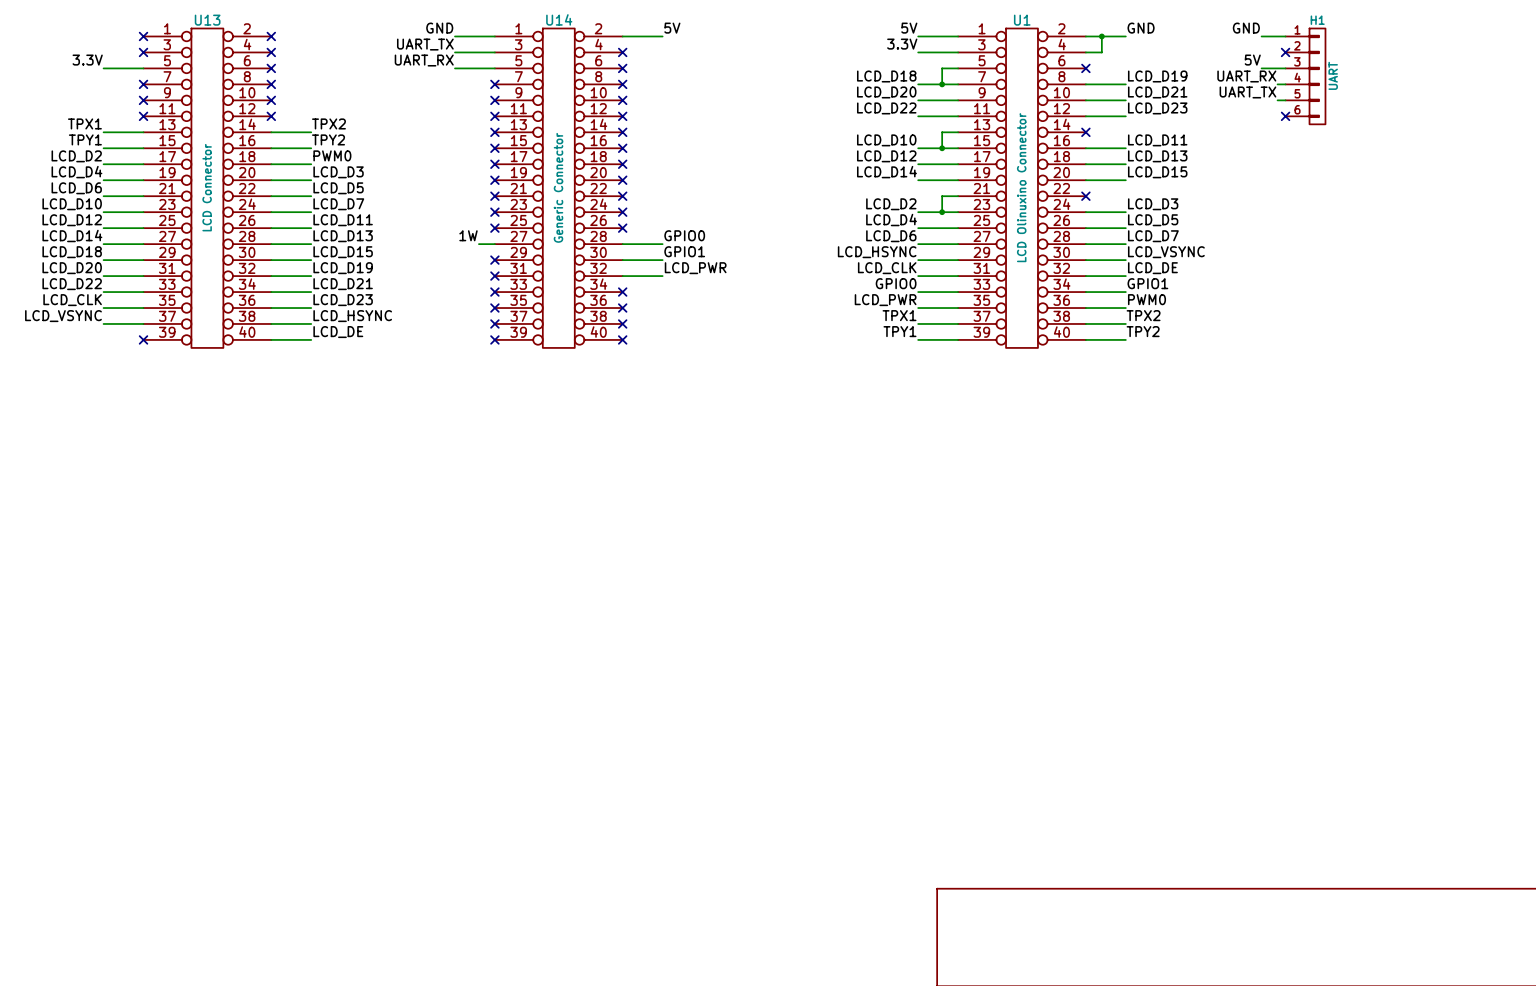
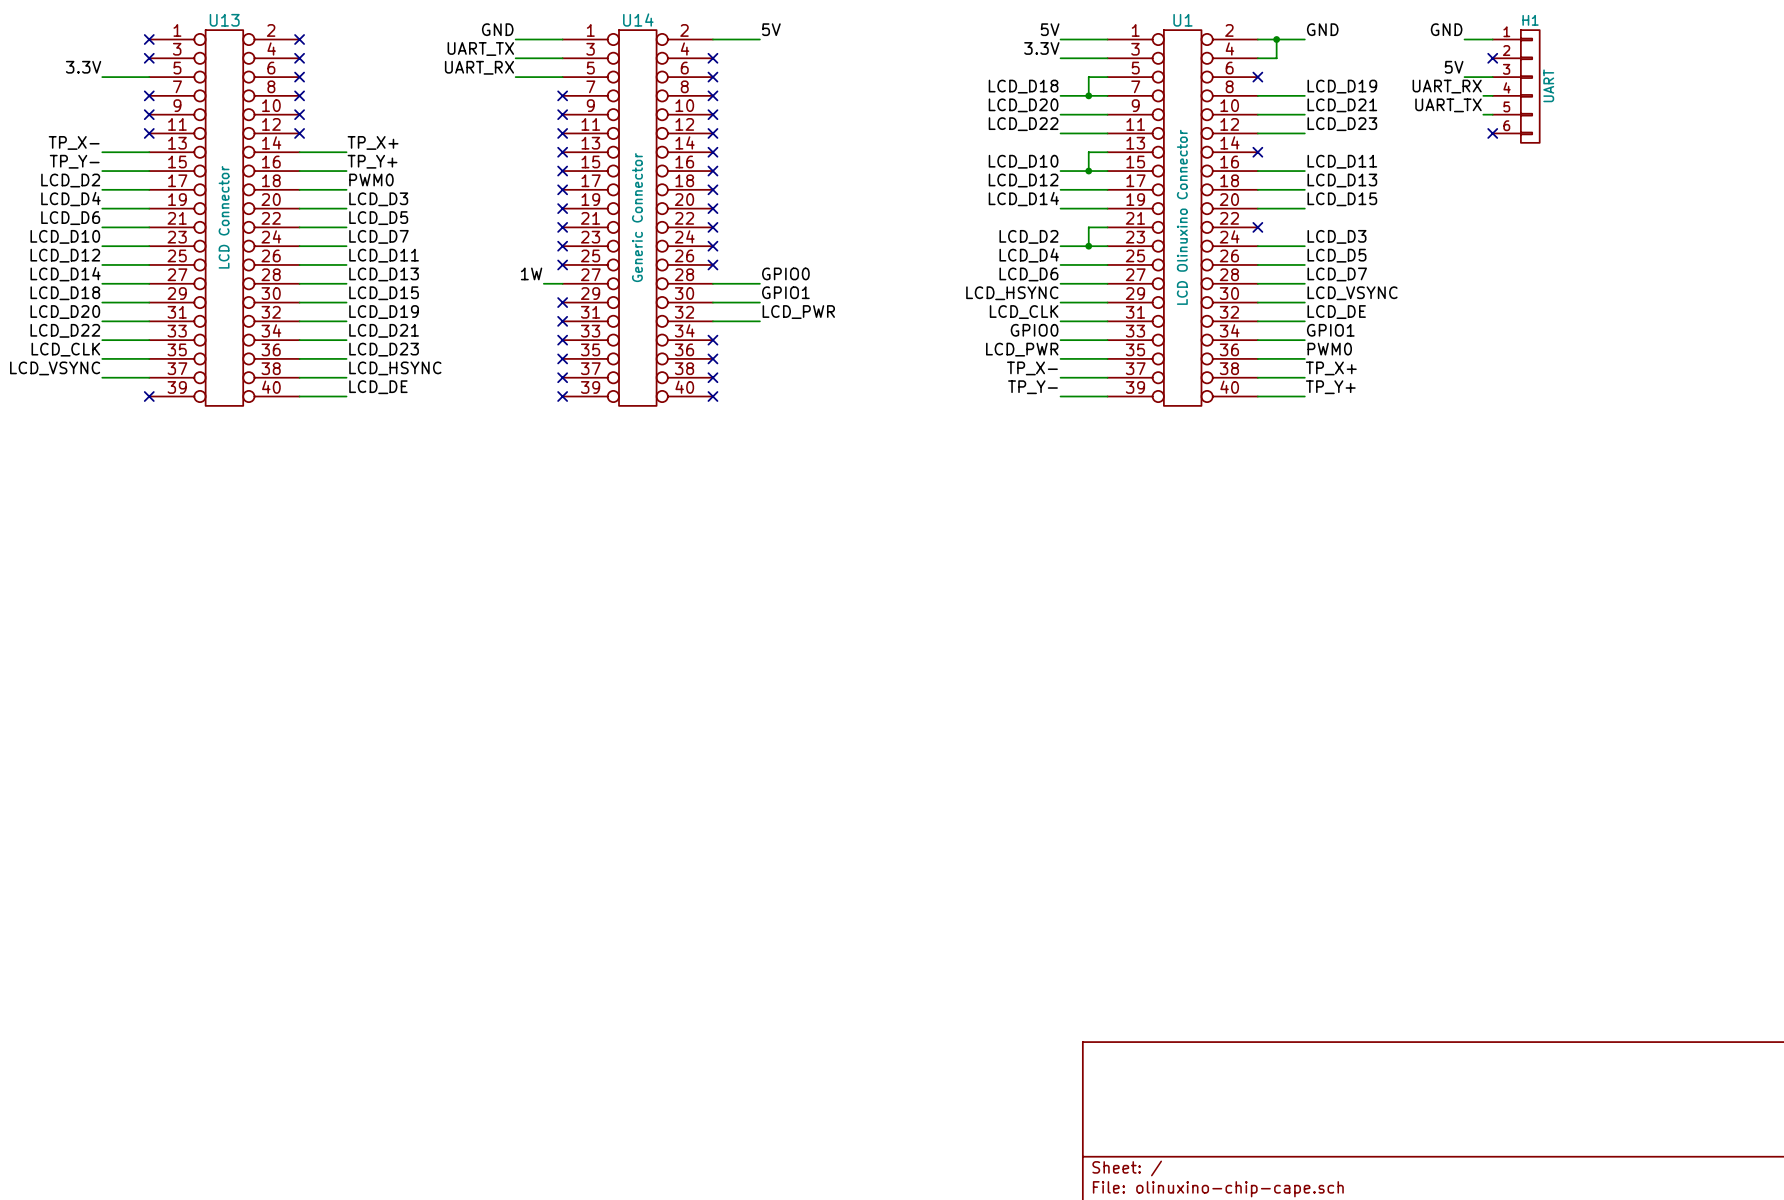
label: TPX1 (84, 123) -> TP_X- (74, 142)
label: TPX2 (328, 123) -> TP_X+ (373, 142)
label: TPY1 (85, 139) -> TP_Y- (74, 161)
label: TPY2 (328, 139) -> TP_Y+ (372, 161)
label: TPX1 (899, 315) -> TP_X- (1032, 368)
label: TPX2 (1143, 315) -> TP_X+ (1331, 368)
label: TPY1 (899, 331) -> TP_Y- (1032, 387)
label: TPY2 (1143, 331) -> TP_Y+ (1330, 387)

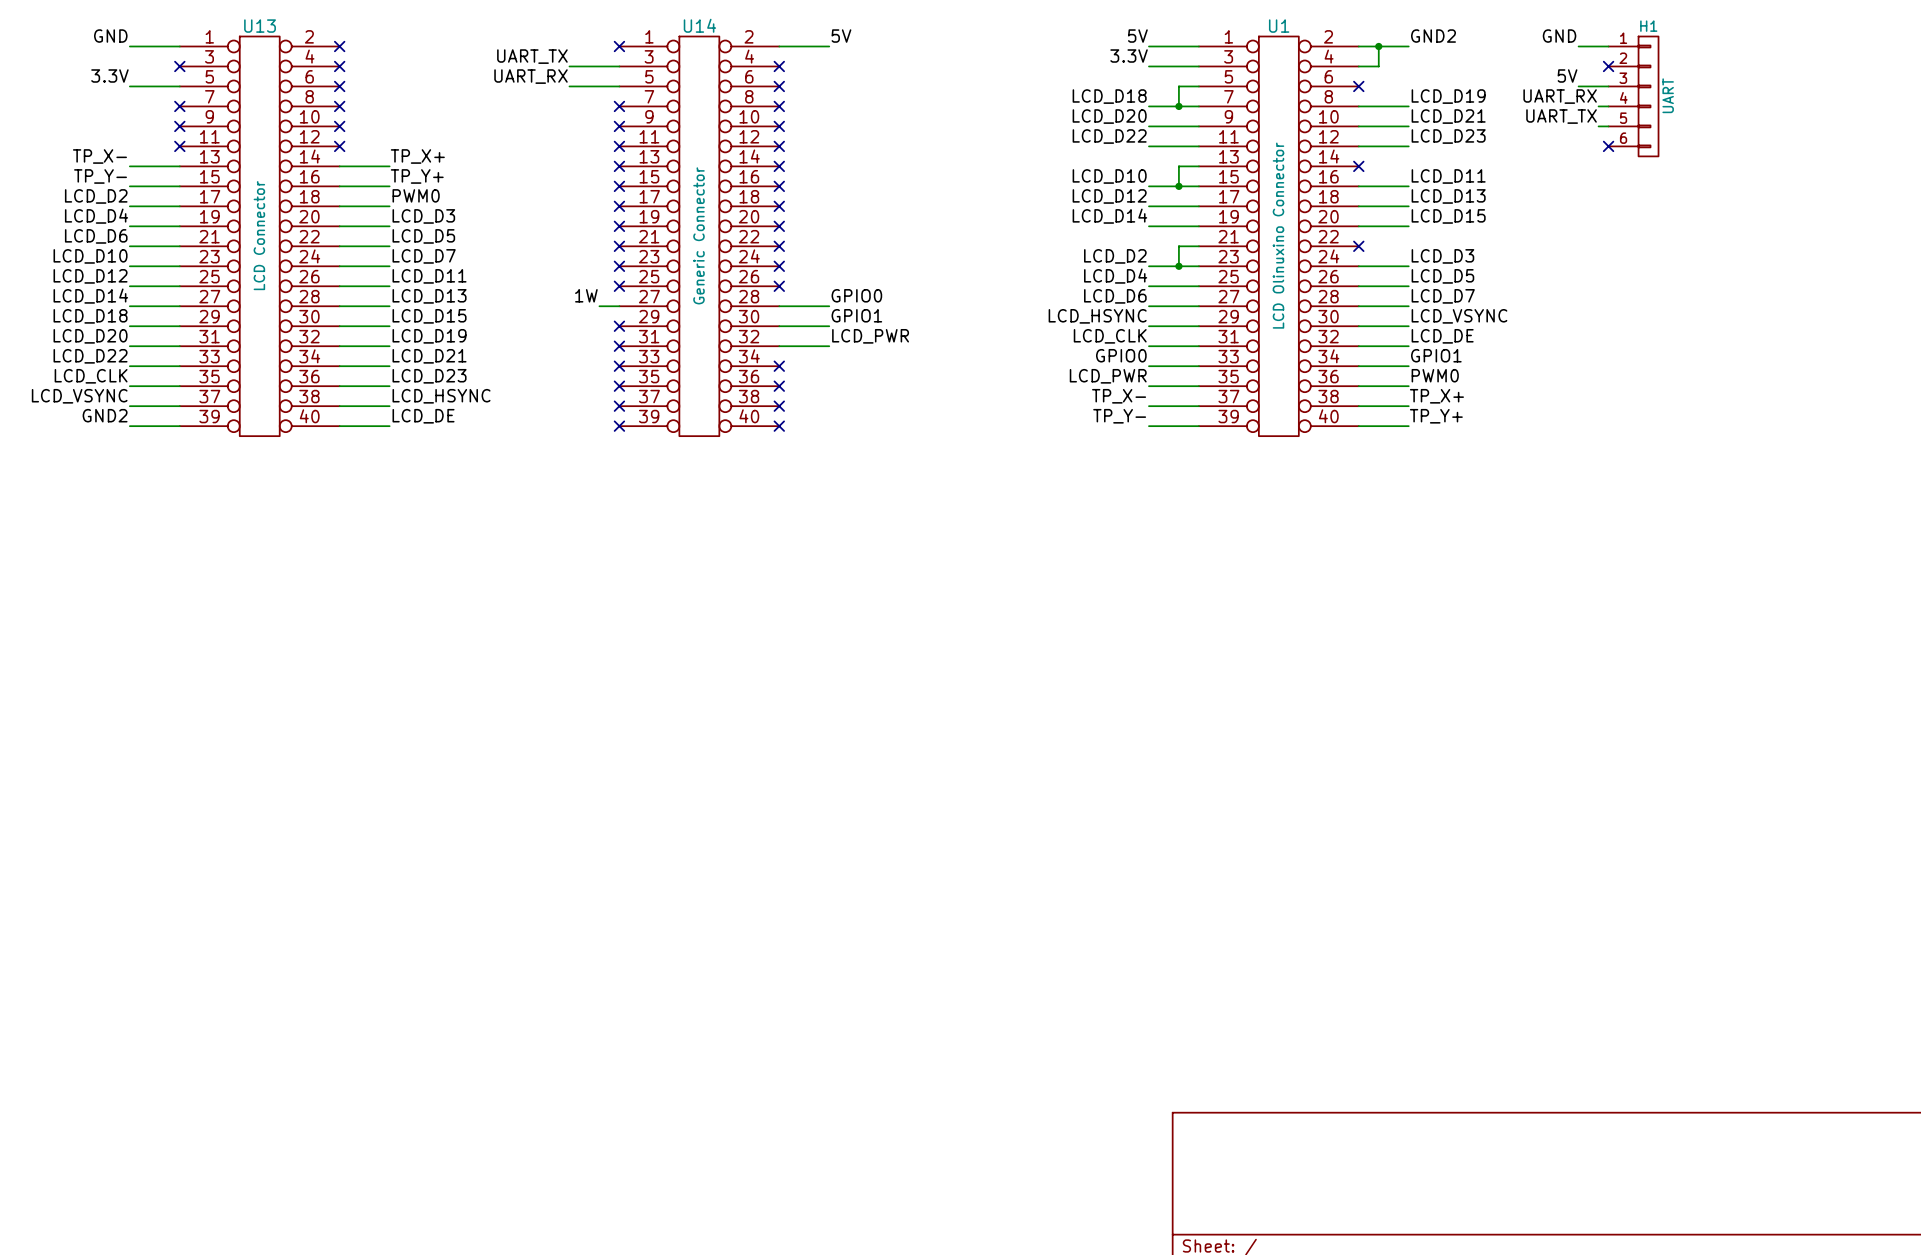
label: none -> GND (110, 36)
label: GND (497, 29) -> none
label: GND (1322, 29) -> GND2 (1433, 36)
wire: none -> (129, 46) (179, 46)
no-connect mark: (149, 39) -> none
wire: (515, 39) (562, 39) -> none
no-connect mark: none -> (619, 46)
label: none -> GND2 (105, 415)
wire: none -> (129, 426) (179, 426)
no-connect mark: (149, 396) -> none

